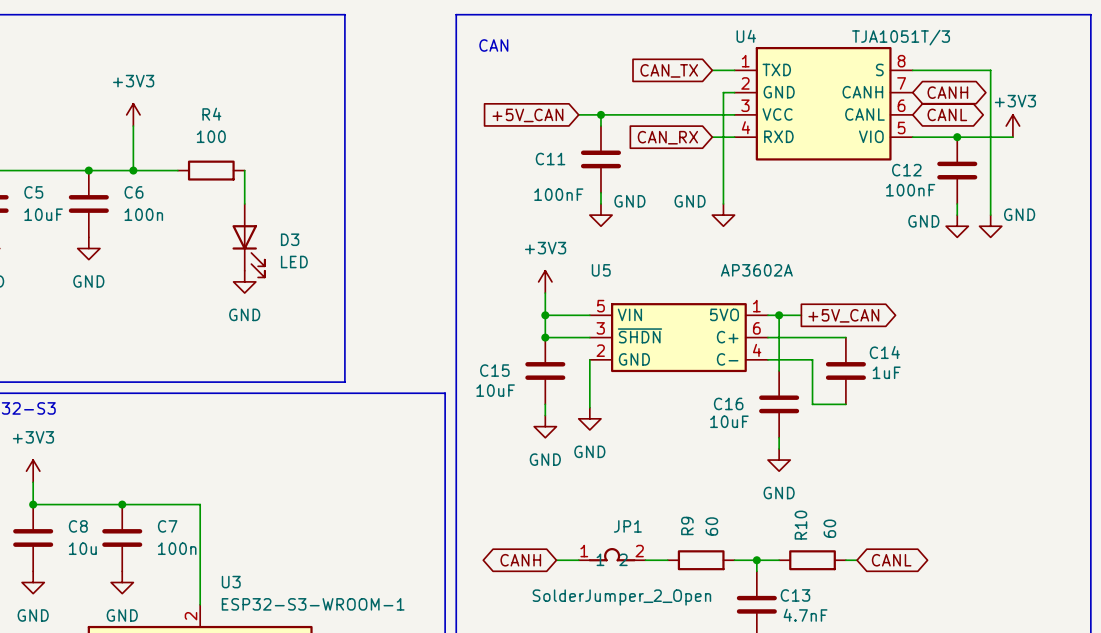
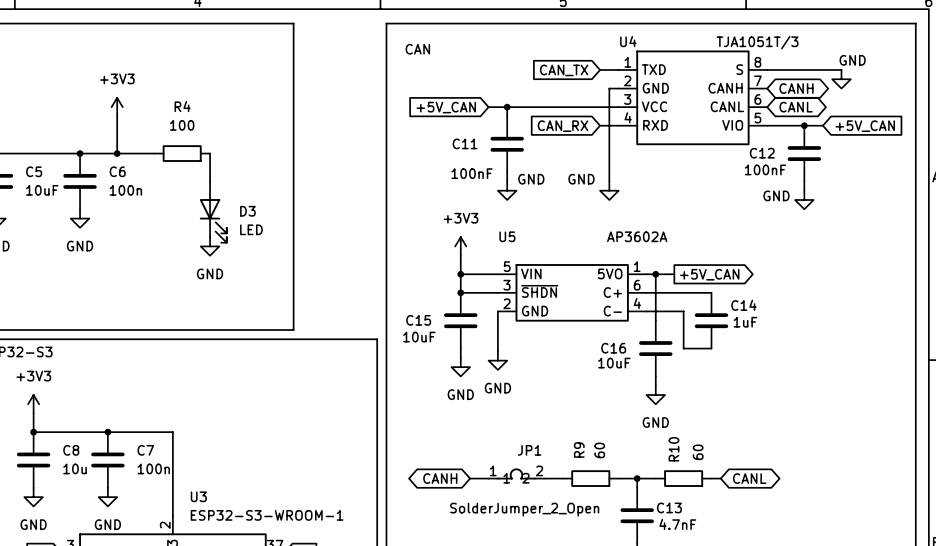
wire: (990, 70) (990, 215) -> (832, 69) (841, 69)
power symbol: +3V3 (1012, 126) -> none
wire: (979, 137) (1012, 137) -> none
global label: none -> +5V_CAN (865, 126)
power symbol text position: GND (1019, 214) -> GND (852, 60)
power symbol position: GND (990, 226) -> GND (841, 79)

